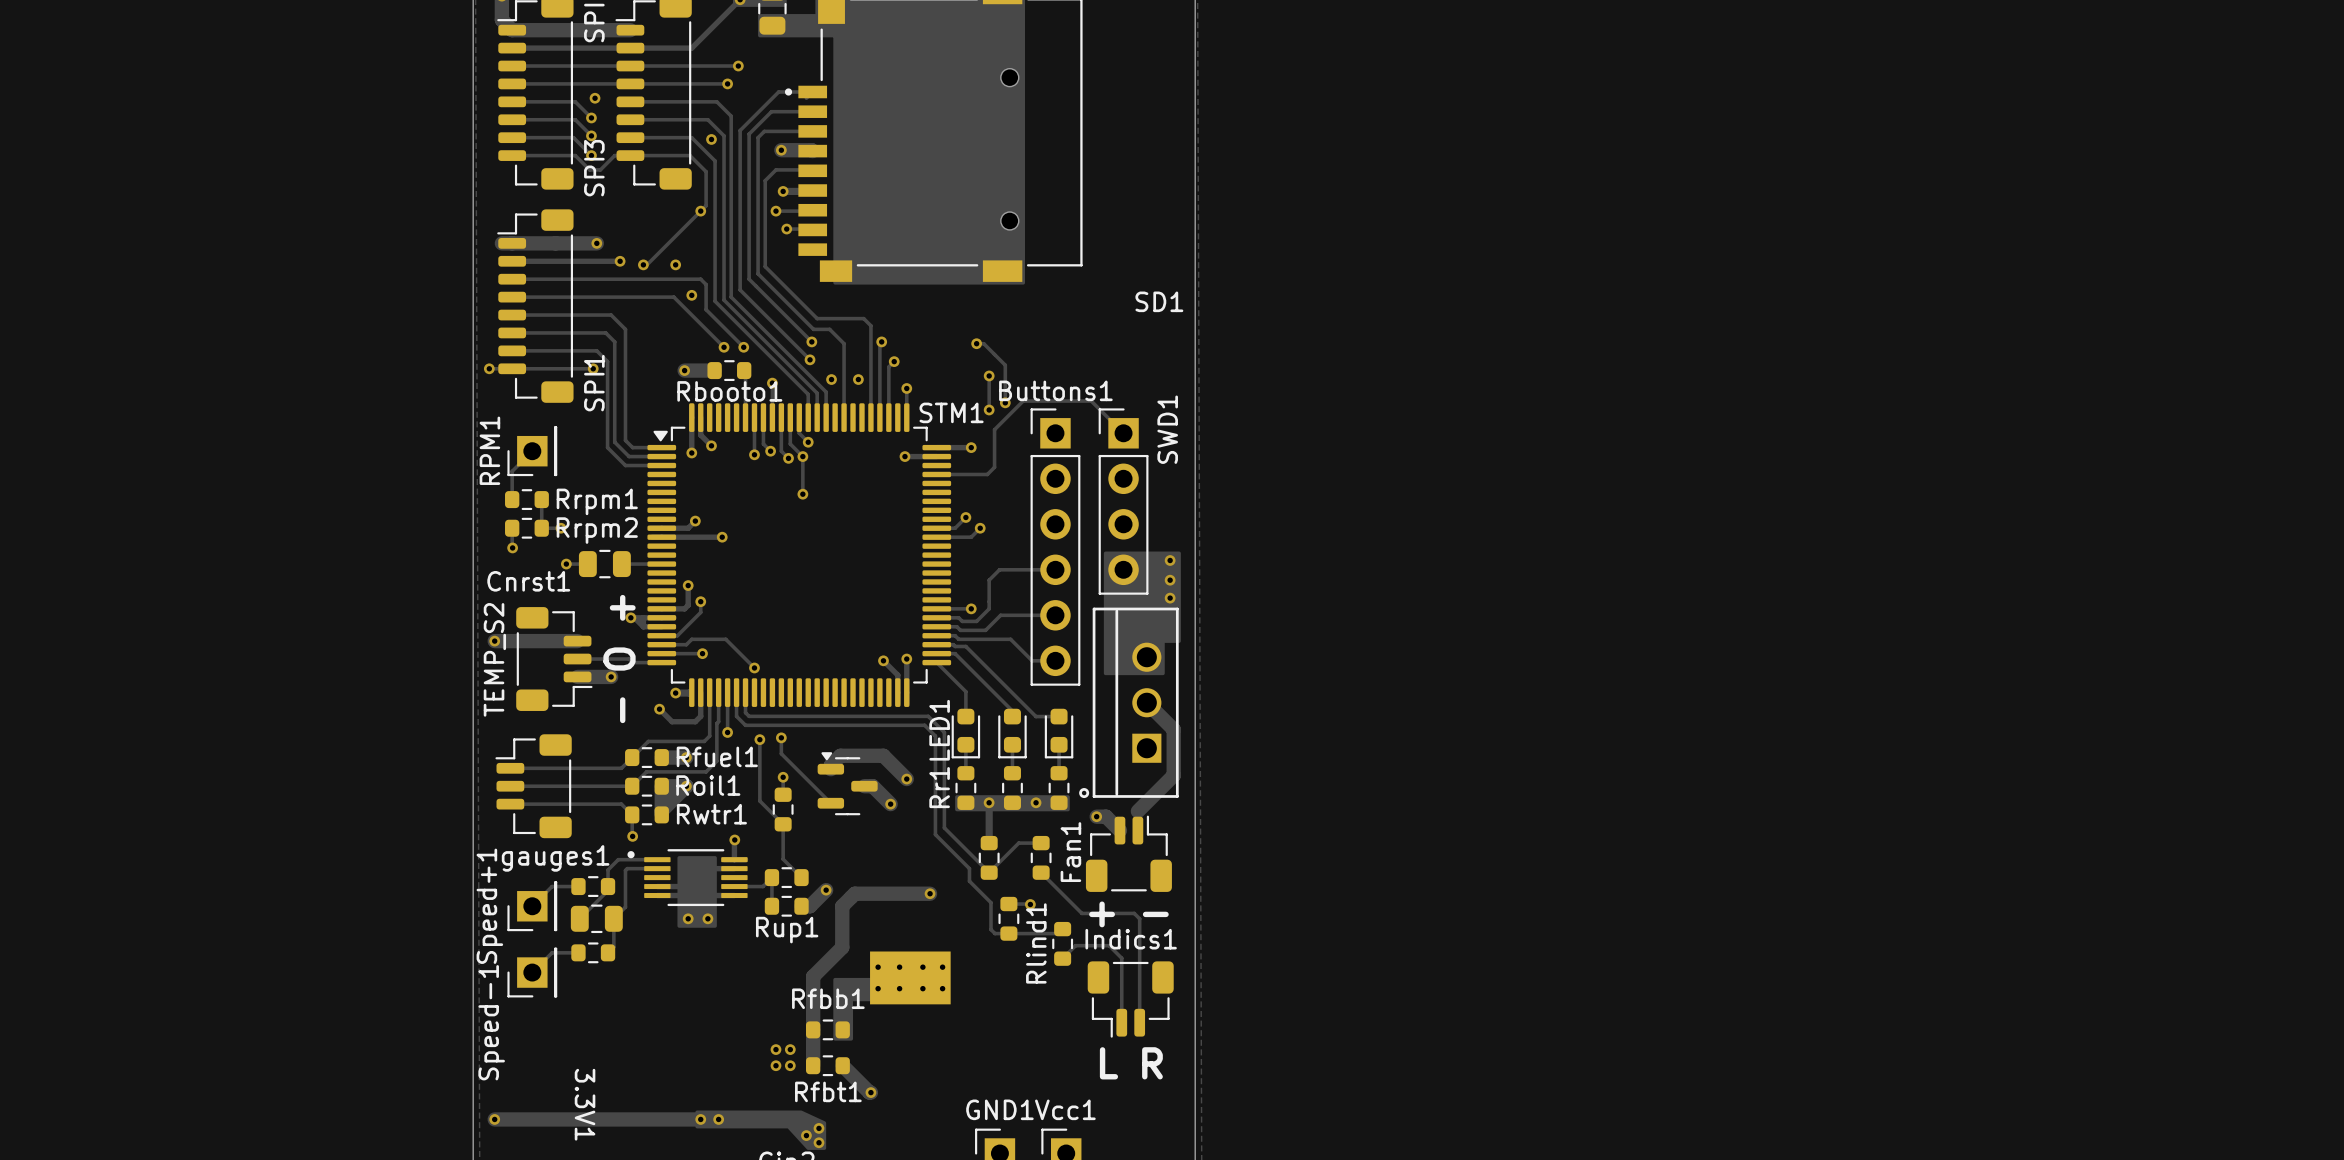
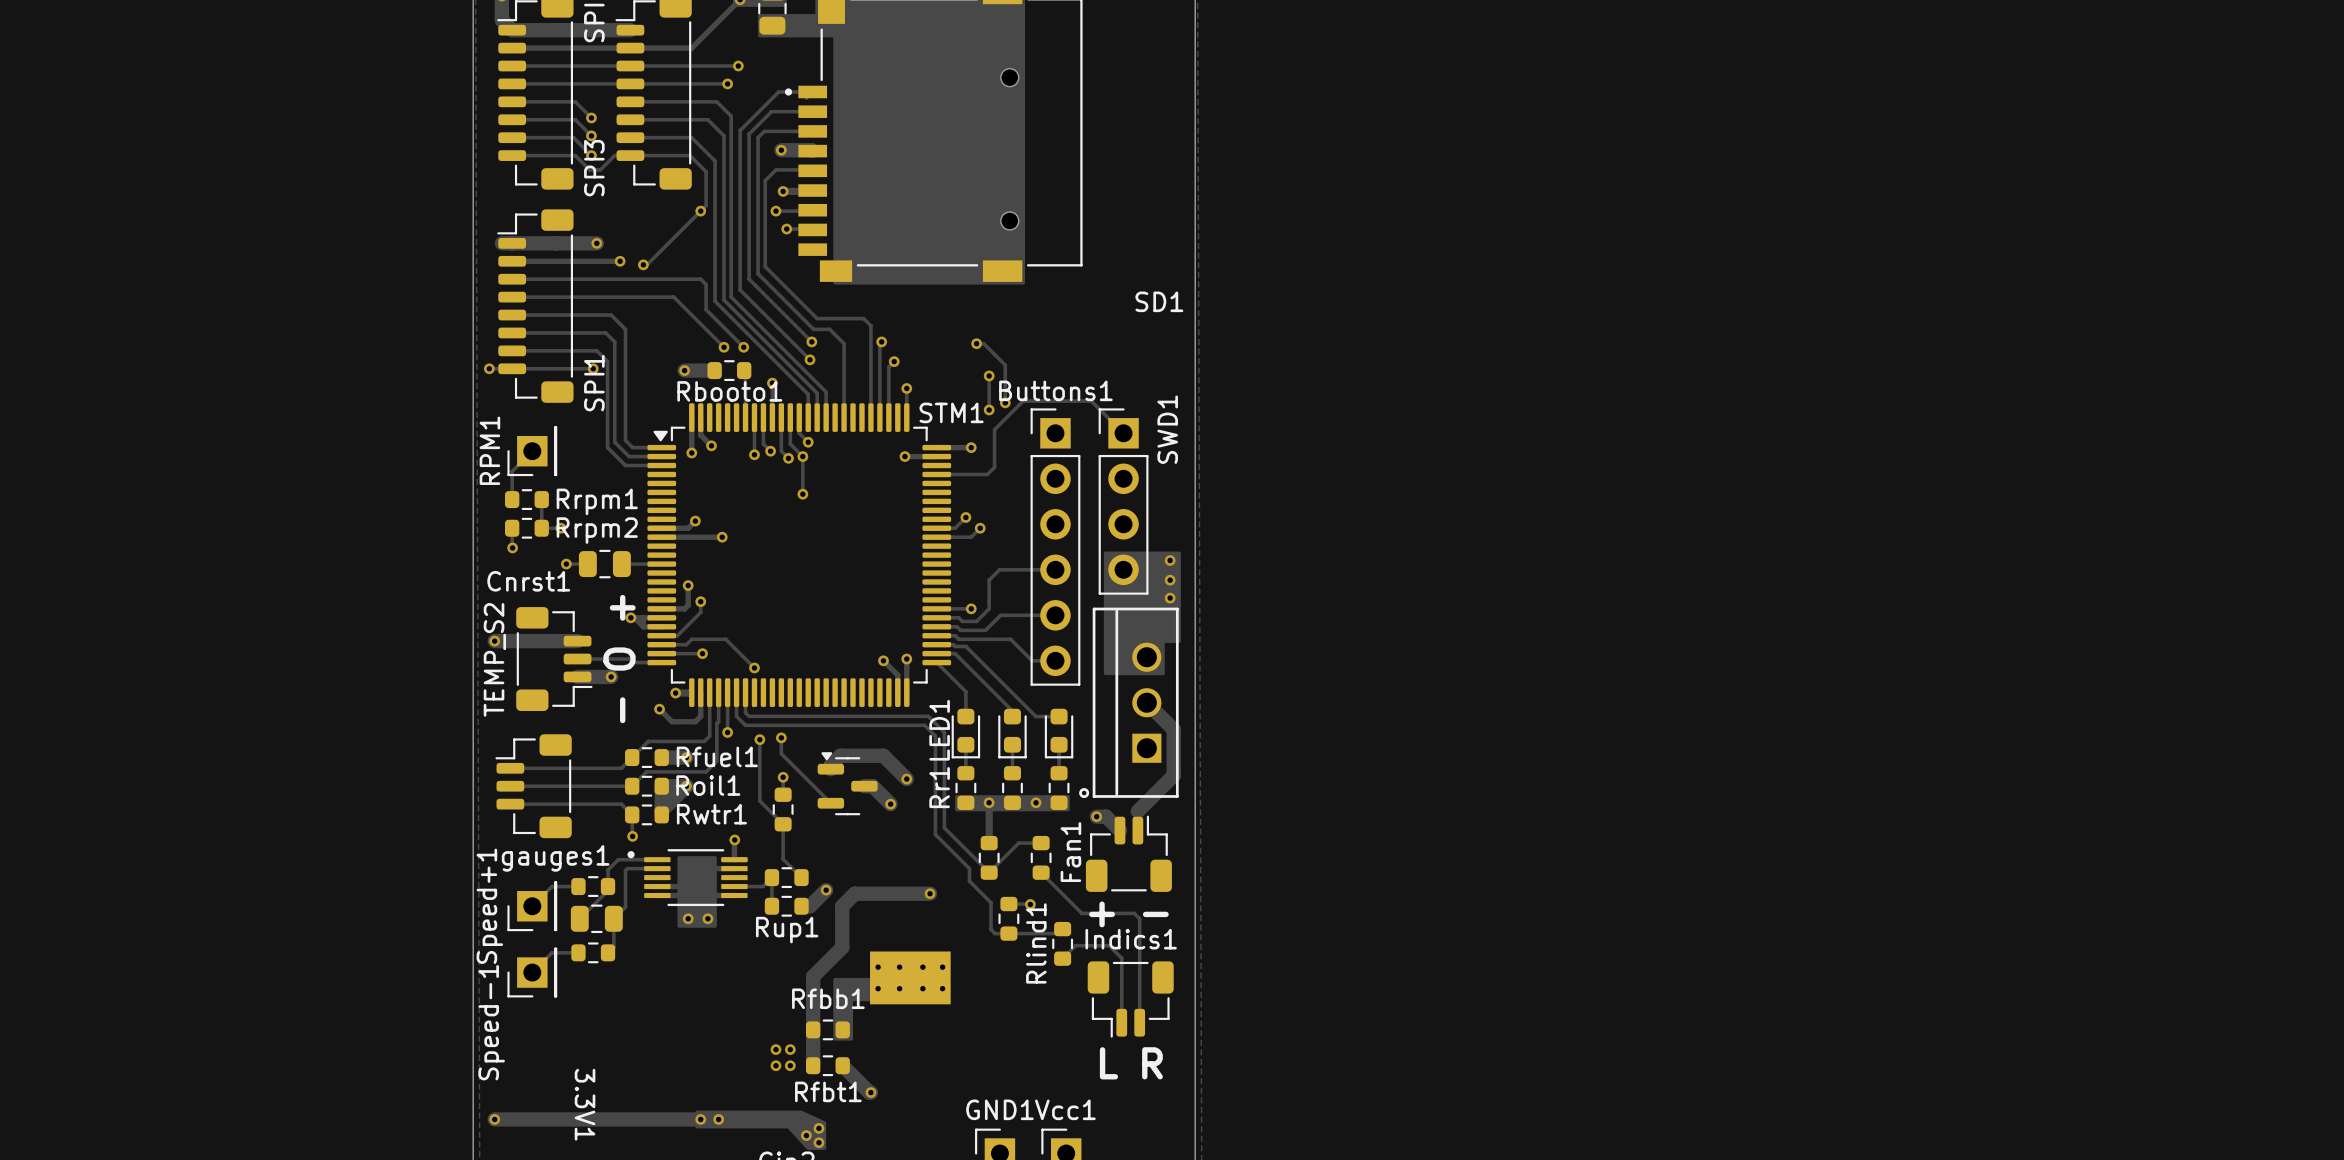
via: (595, 98) -> none
via: (711, 139) -> none
via: (675, 264) -> none
via: (691, 295) -> none
via: (831, 379) -> none
via: (858, 379) -> none

